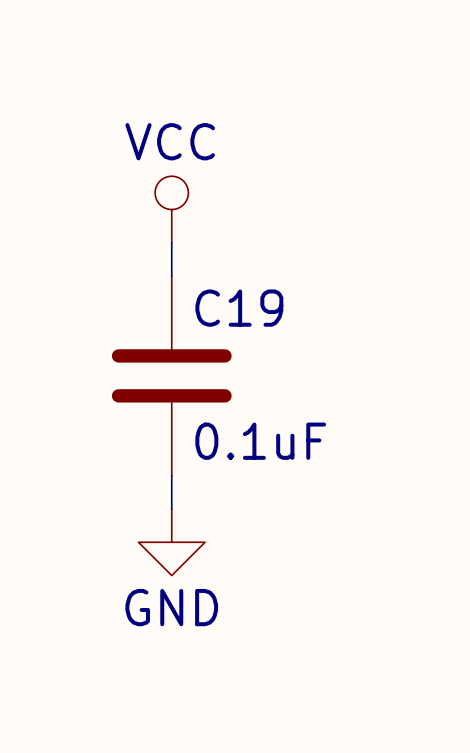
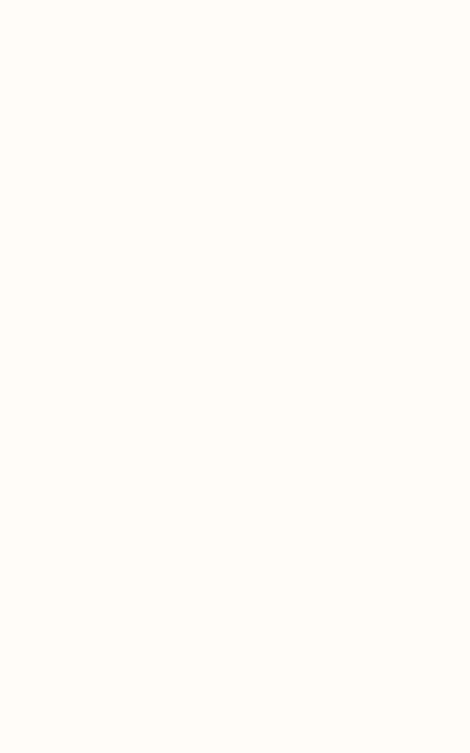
power symbol: VCC (171, 209) -> none
wire: (171, 242) (171, 276) -> none
C19: 0.1uF (171, 375) -> none
wire: (171, 475) (171, 508) -> none
power symbol: GND (171, 542) -> none

